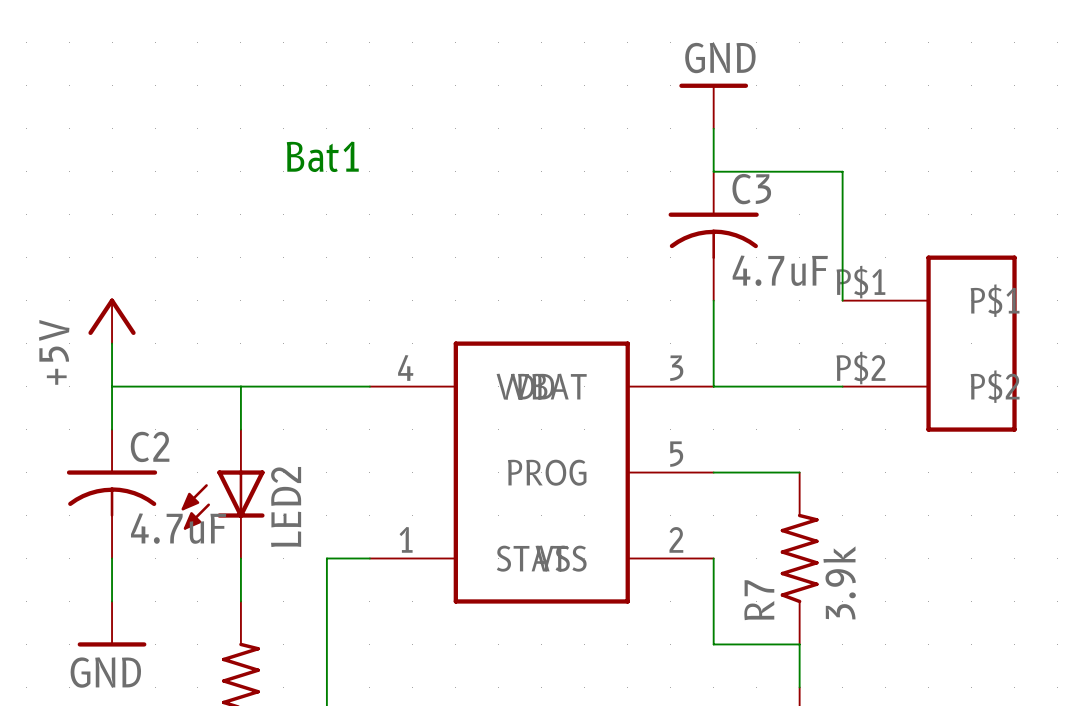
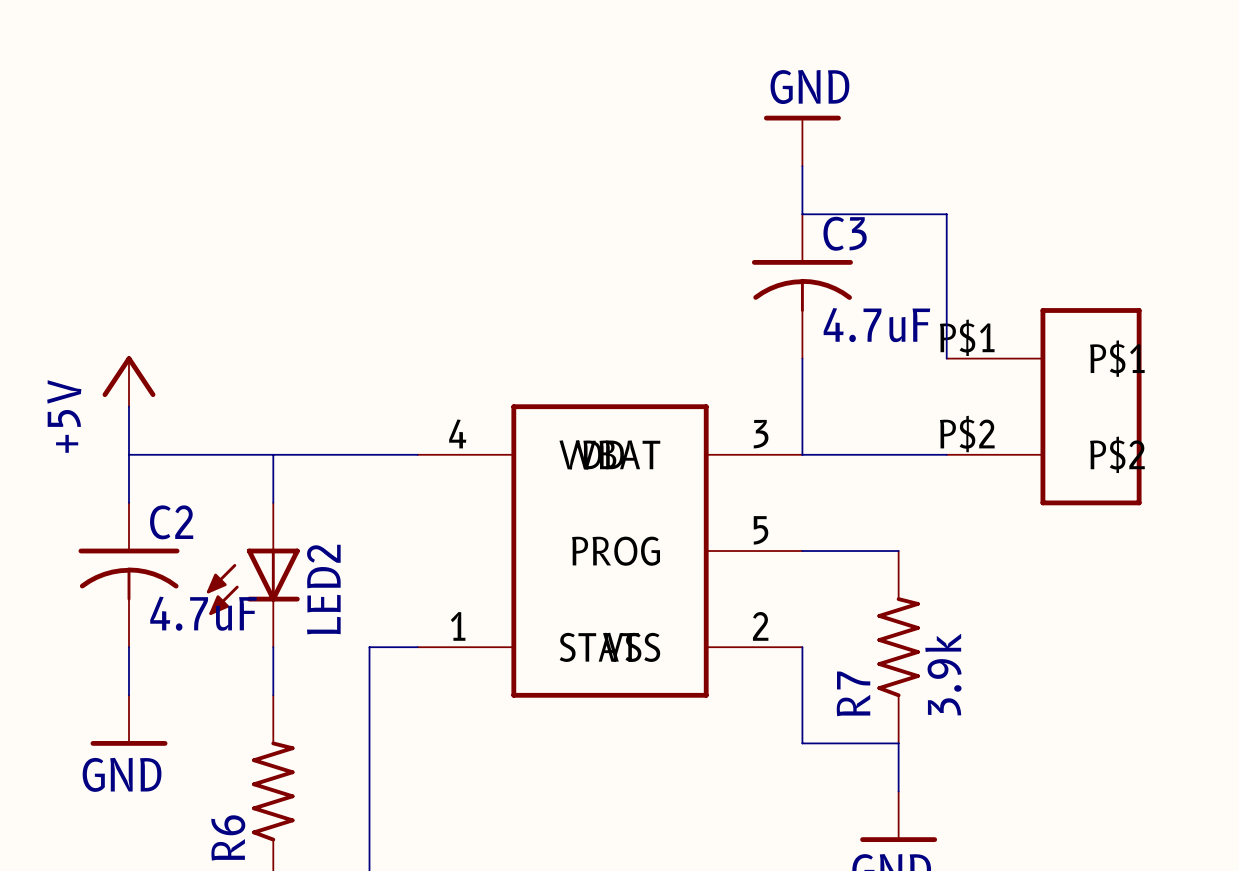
text: Bat1 (322, 156) -> none

